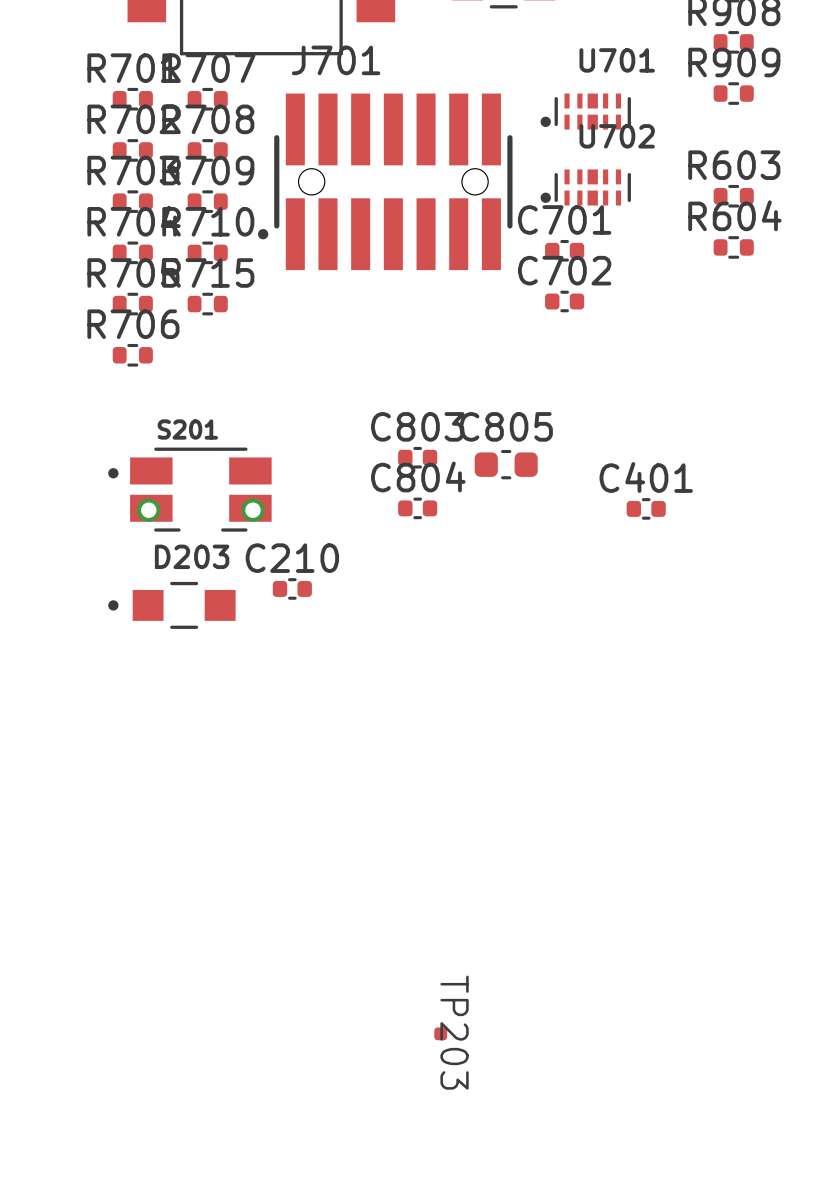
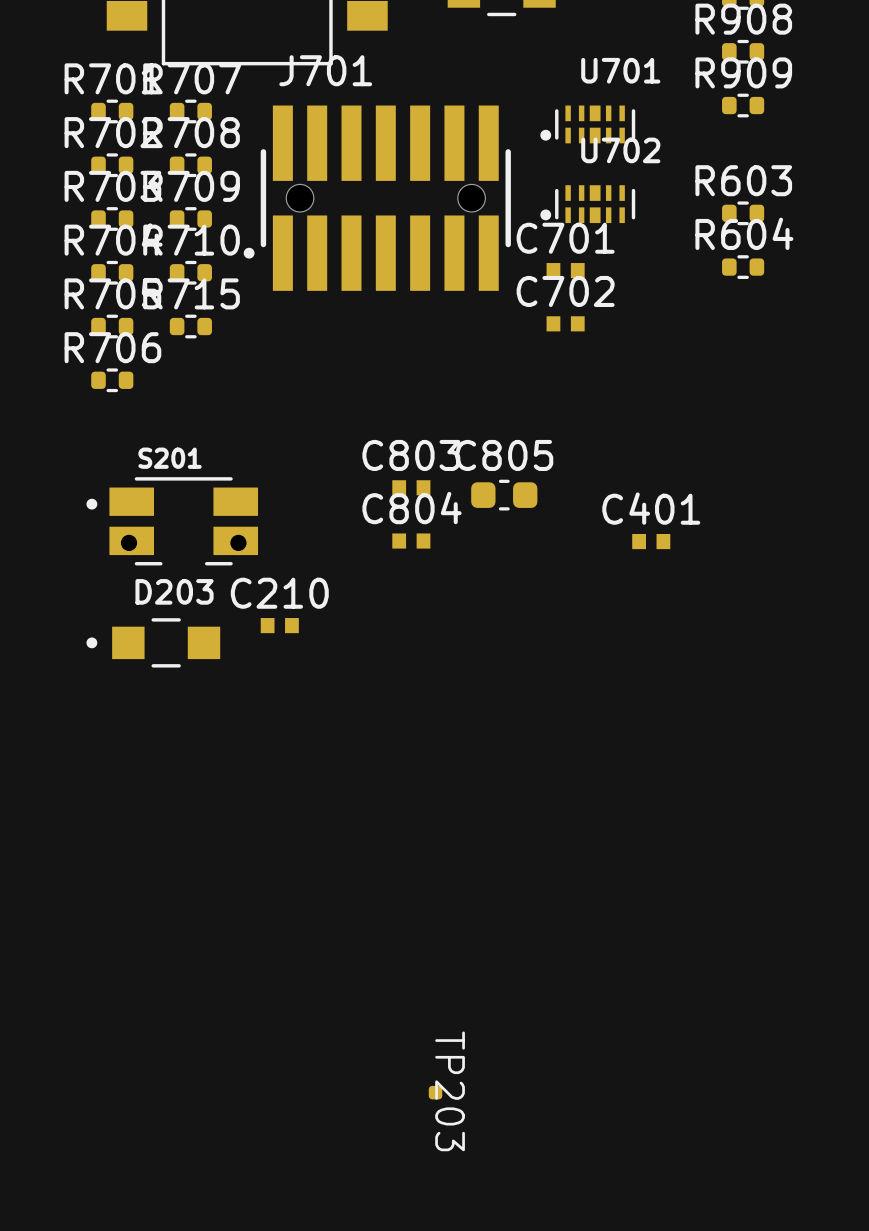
C701 footprint: [545, 239, 585, 262] -> [546, 263, 585, 279]
C702 footprint: [545, 290, 585, 313] -> [546, 316, 585, 332]
C803 footprint: [398, 446, 438, 469] -> [392, 480, 431, 496]
C804 footprint: [398, 497, 438, 520] -> [392, 533, 431, 549]
C401 footprint: [626, 498, 666, 520] -> [632, 534, 671, 550]
C210 footprint: [272, 578, 312, 600] -> [260, 618, 299, 634]

